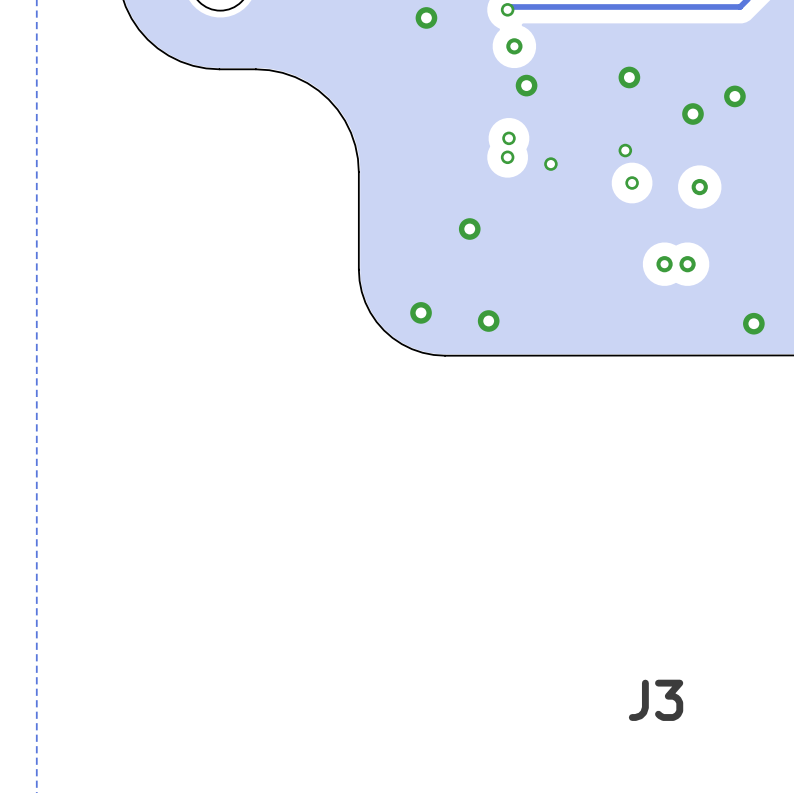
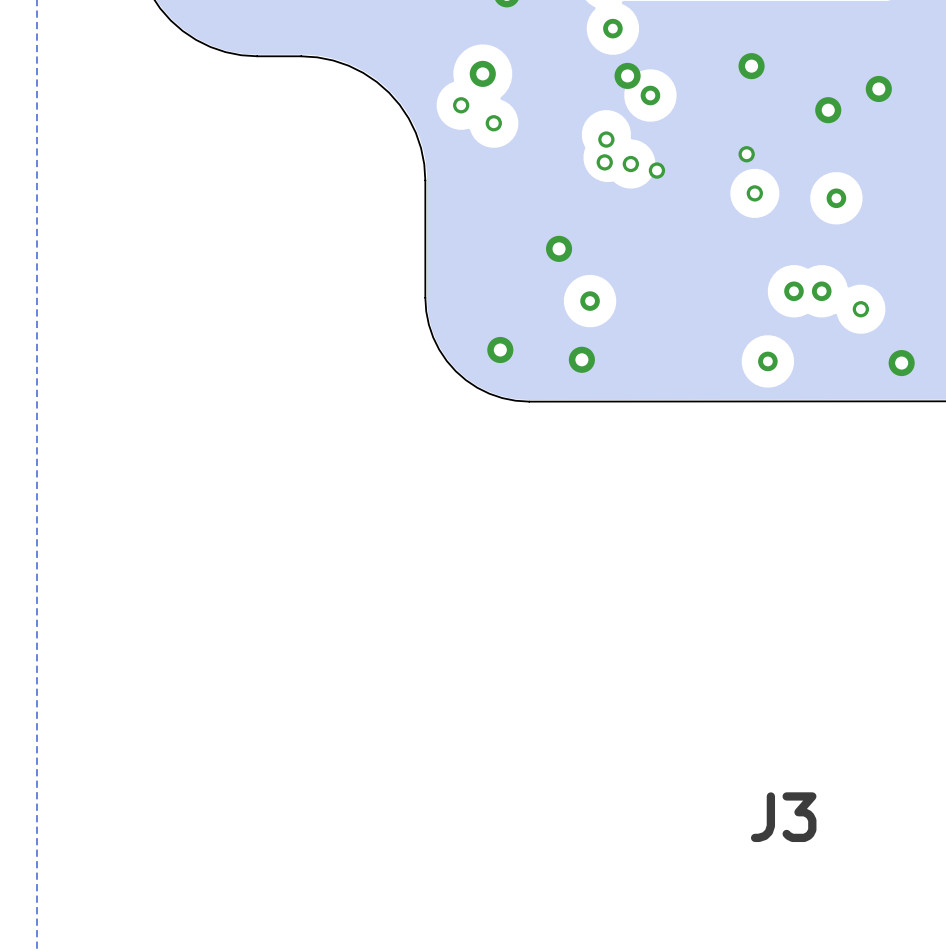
via: none -> (482, 73)
via: none -> (650, 95)
via: none -> (461, 105)
via: none -> (493, 123)
via: none -> (630, 164)
via: none -> (590, 301)
via: none -> (860, 309)
via: none -> (767, 361)

